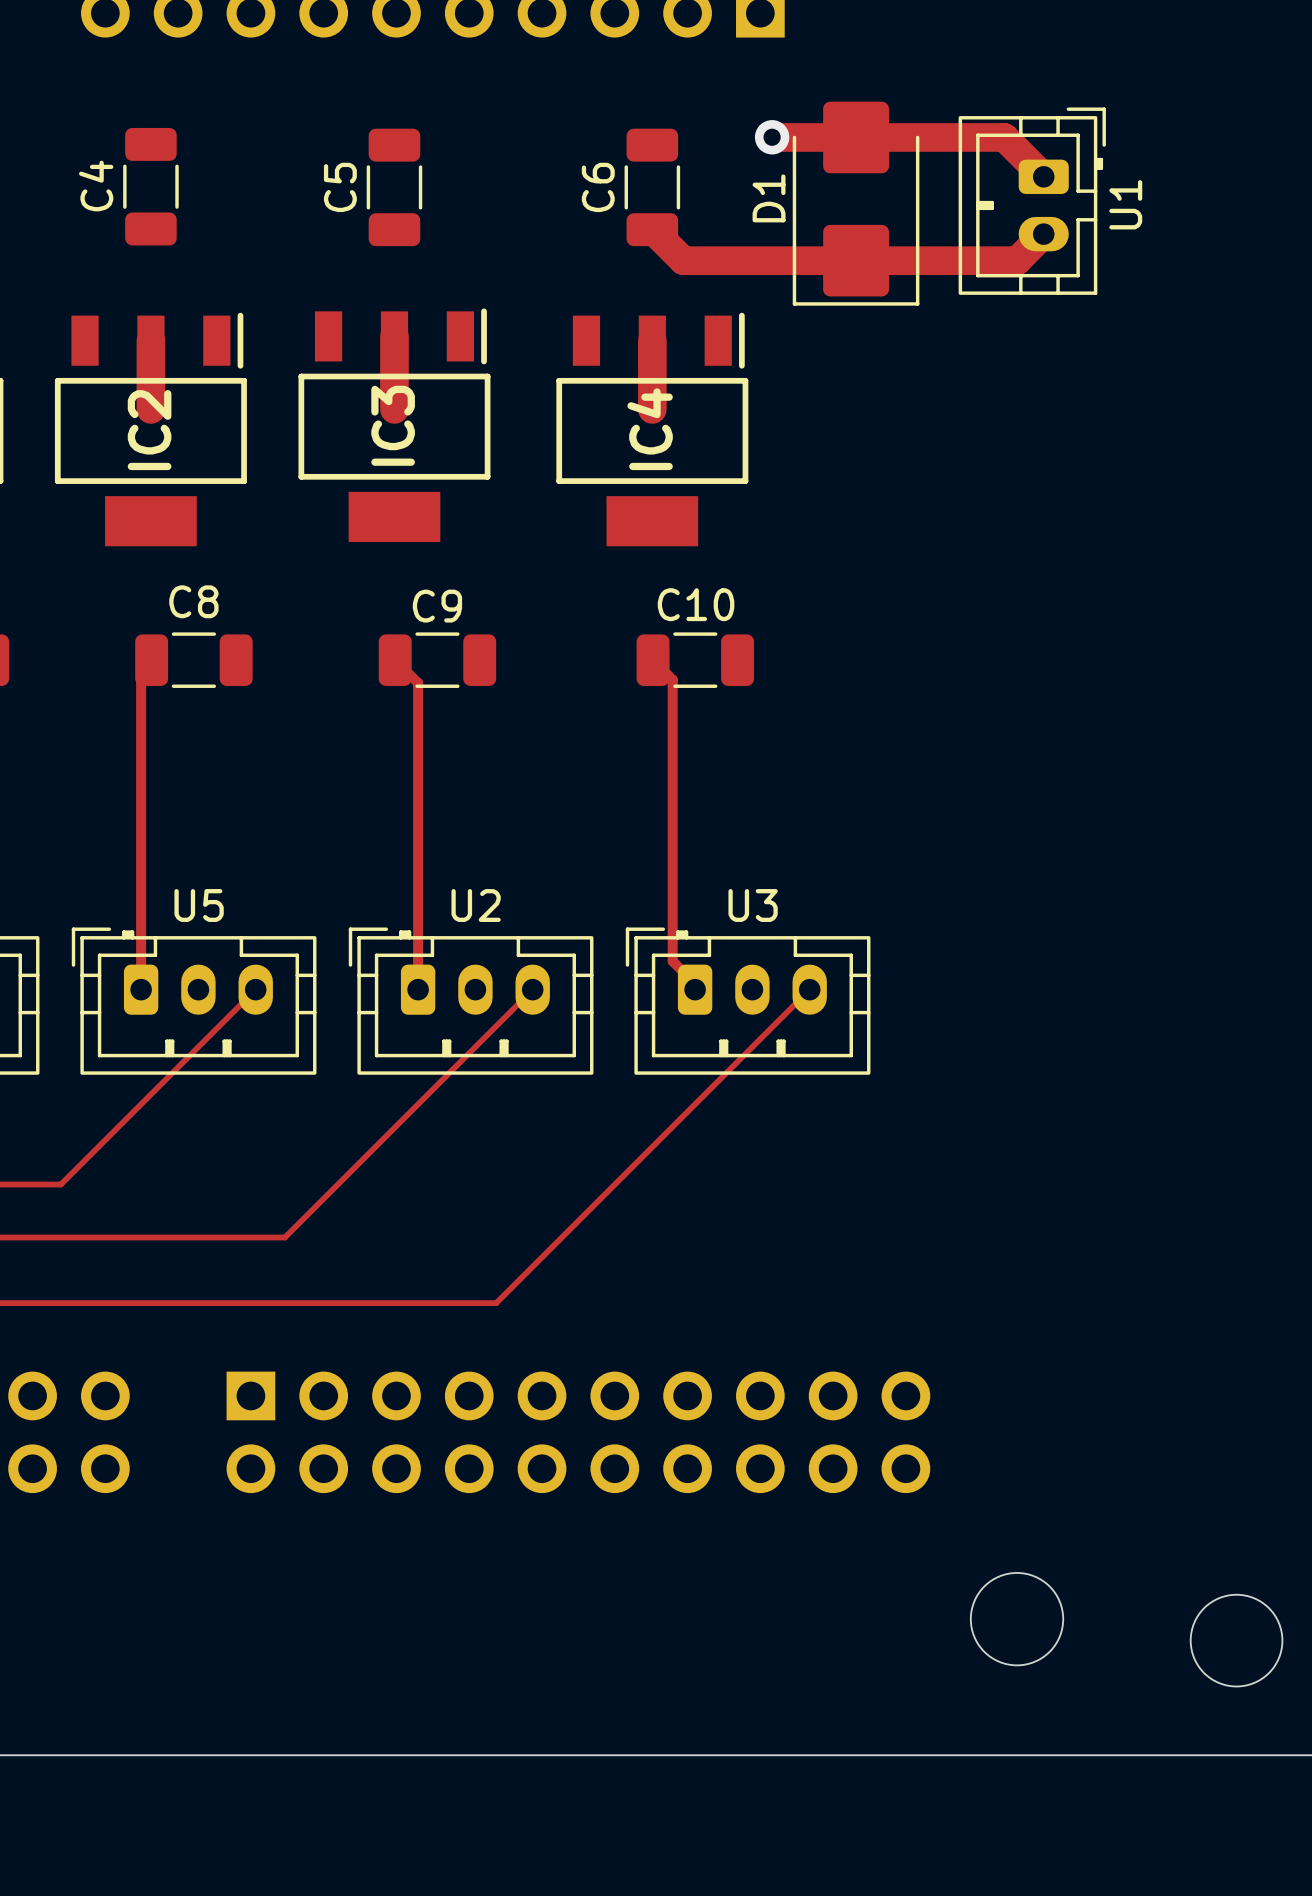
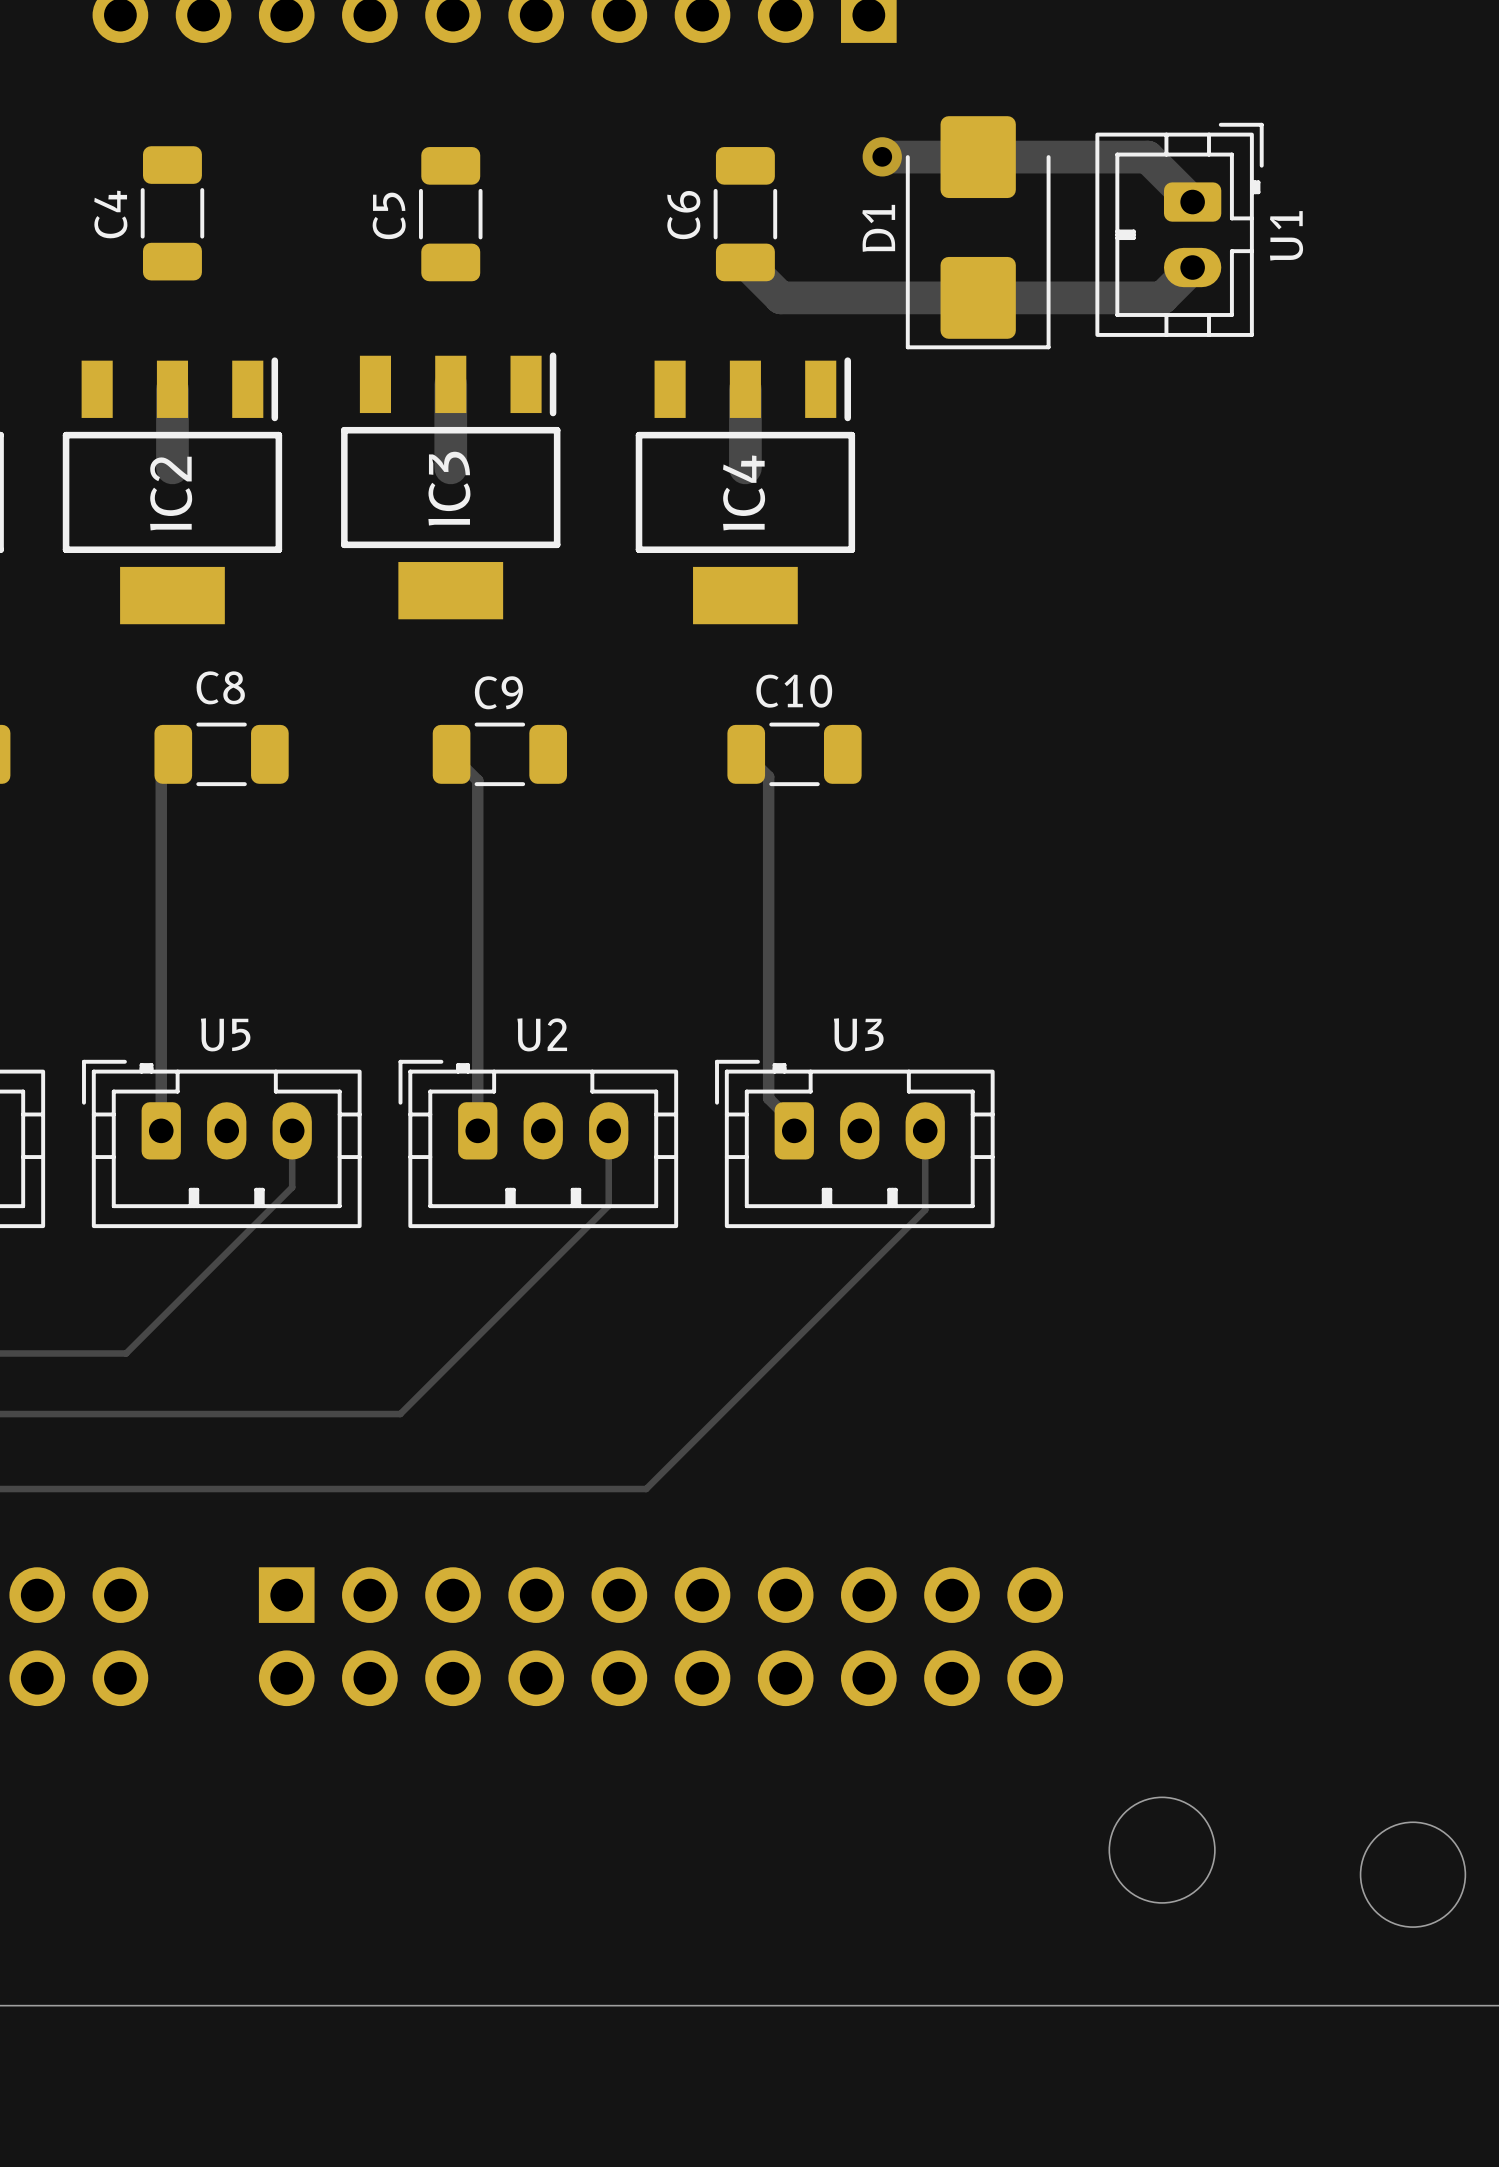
track: (255, 989) (60, 1184) -> (292, 1130) (292, 1187) (126, 1353) (69, 1353)
track: (532, 989) (284, 1237) -> (608, 1130) (608, 1205) (400, 1414) (325, 1414)
track: (809, 989) (496, 1303) -> (925, 1130) (925, 1210) (646, 1489) (567, 1489)

